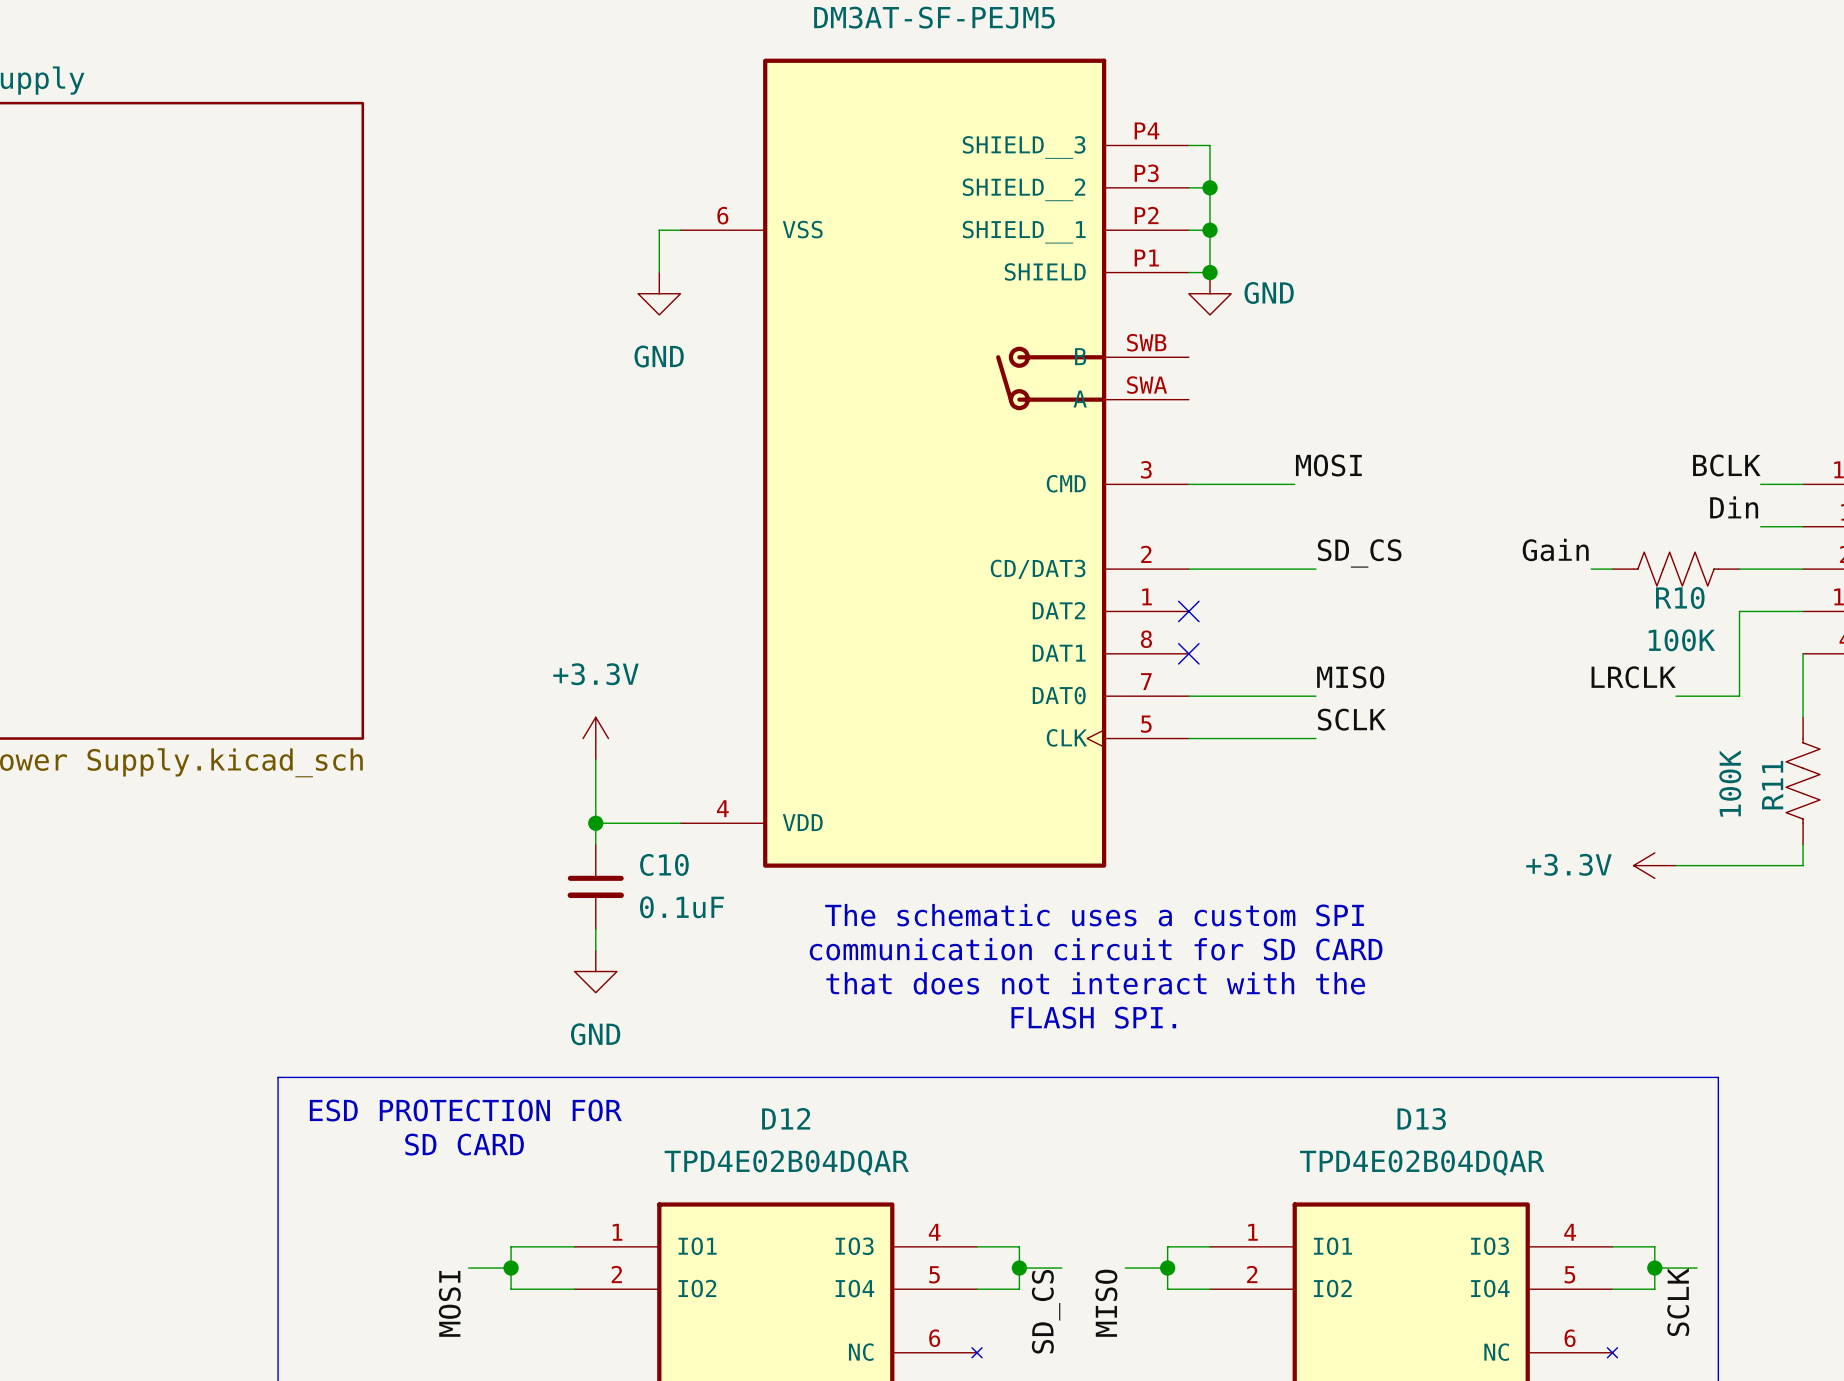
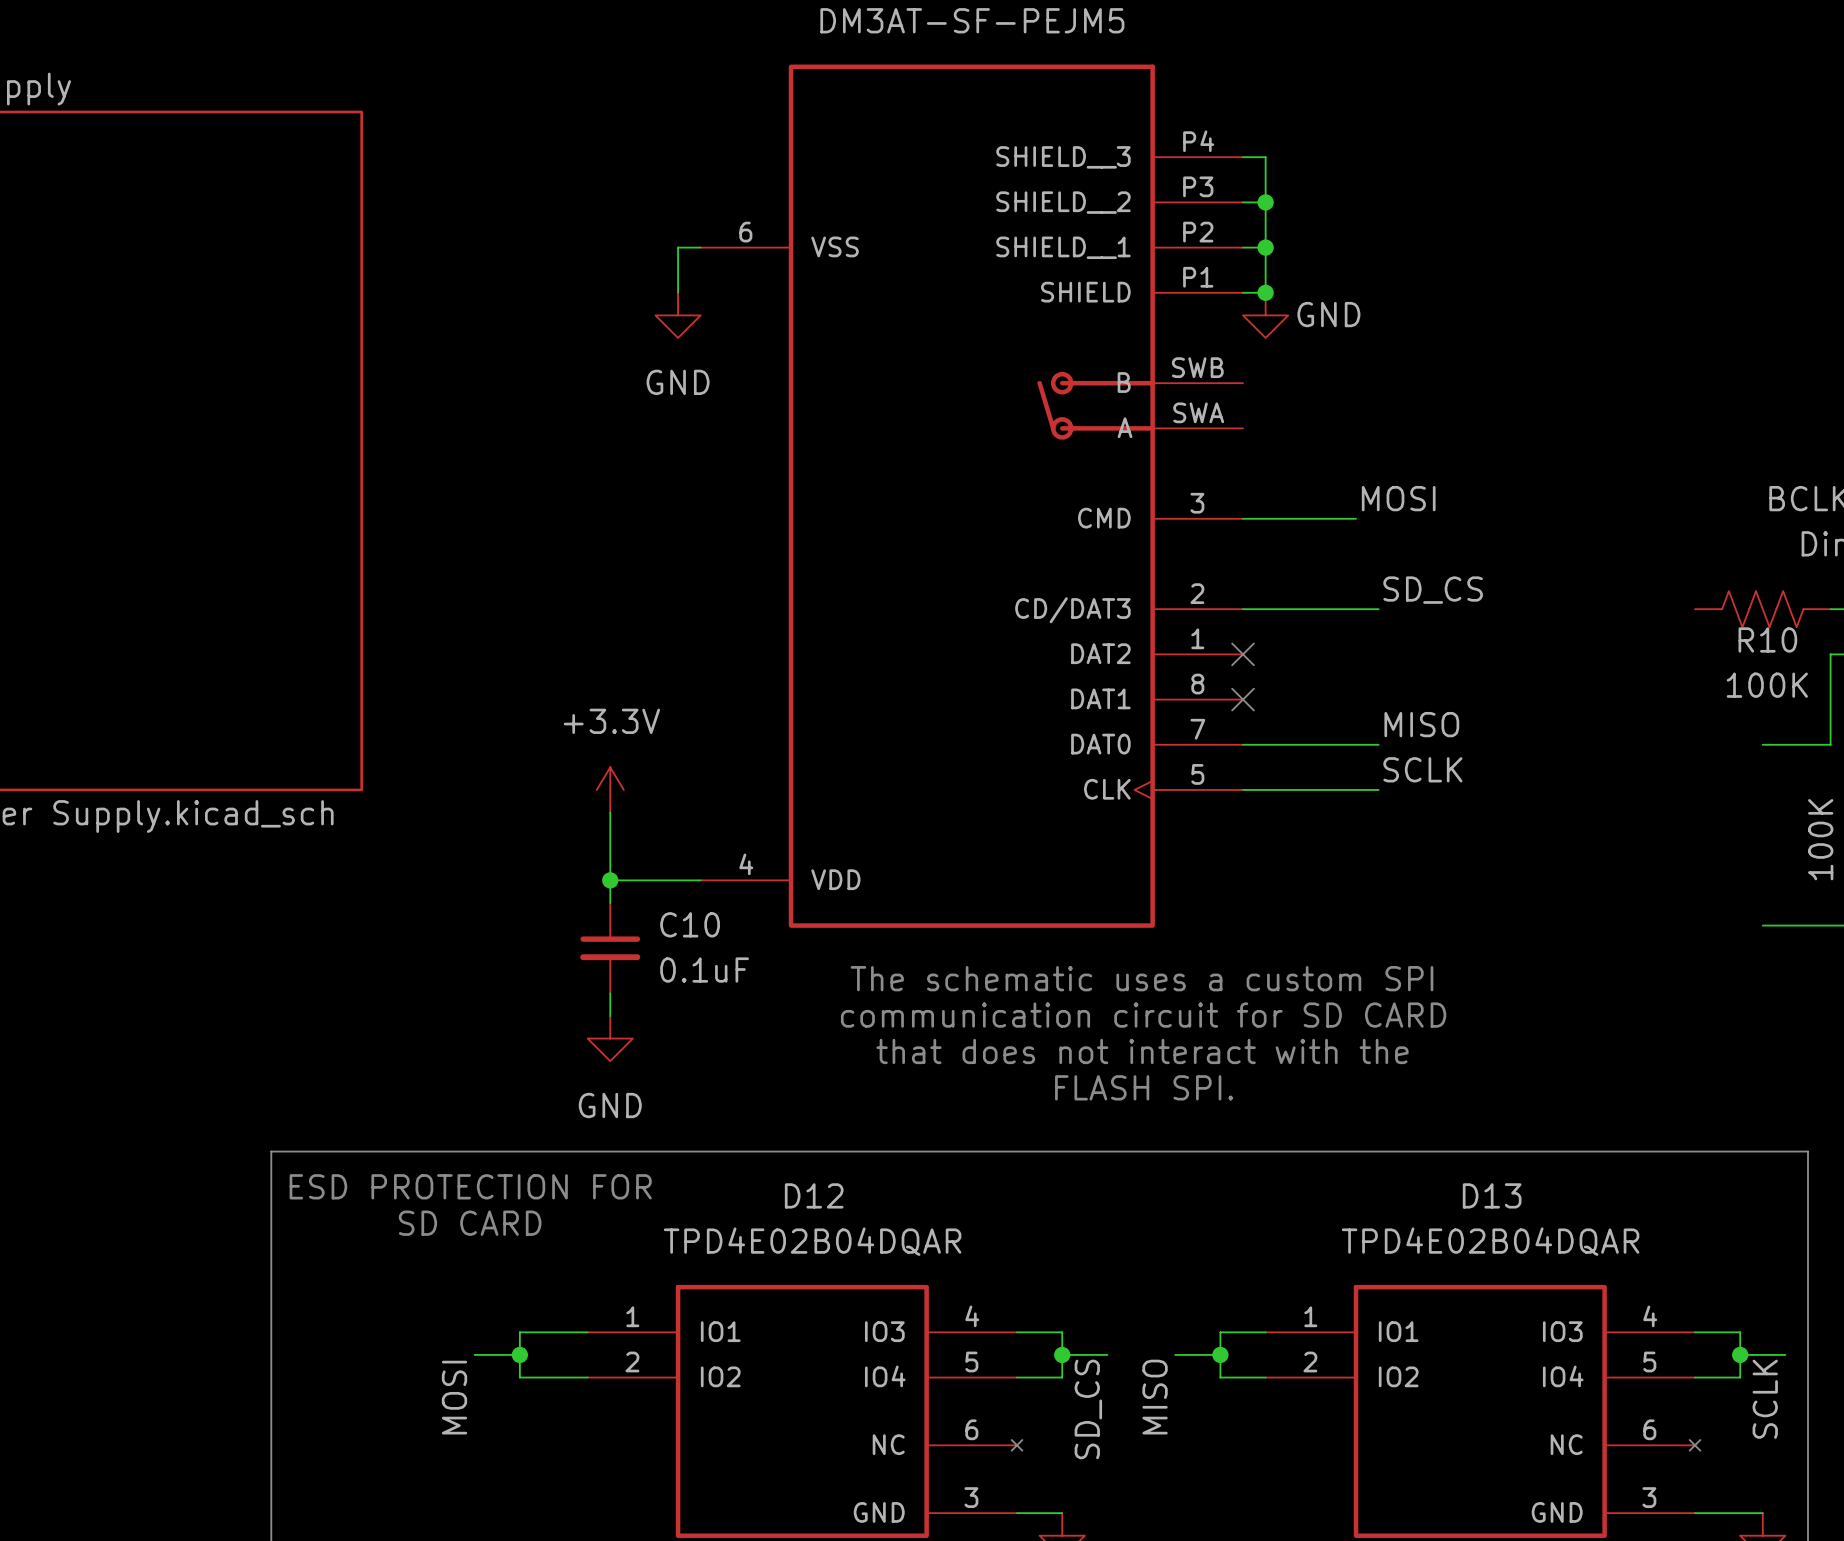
label: Gain (1555, 549) -> none
wire: (1591, 569) (1612, 569) -> none
label: LRCLK (1633, 677) -> none
power symbol: +3.3V (1654, 865) -> none

